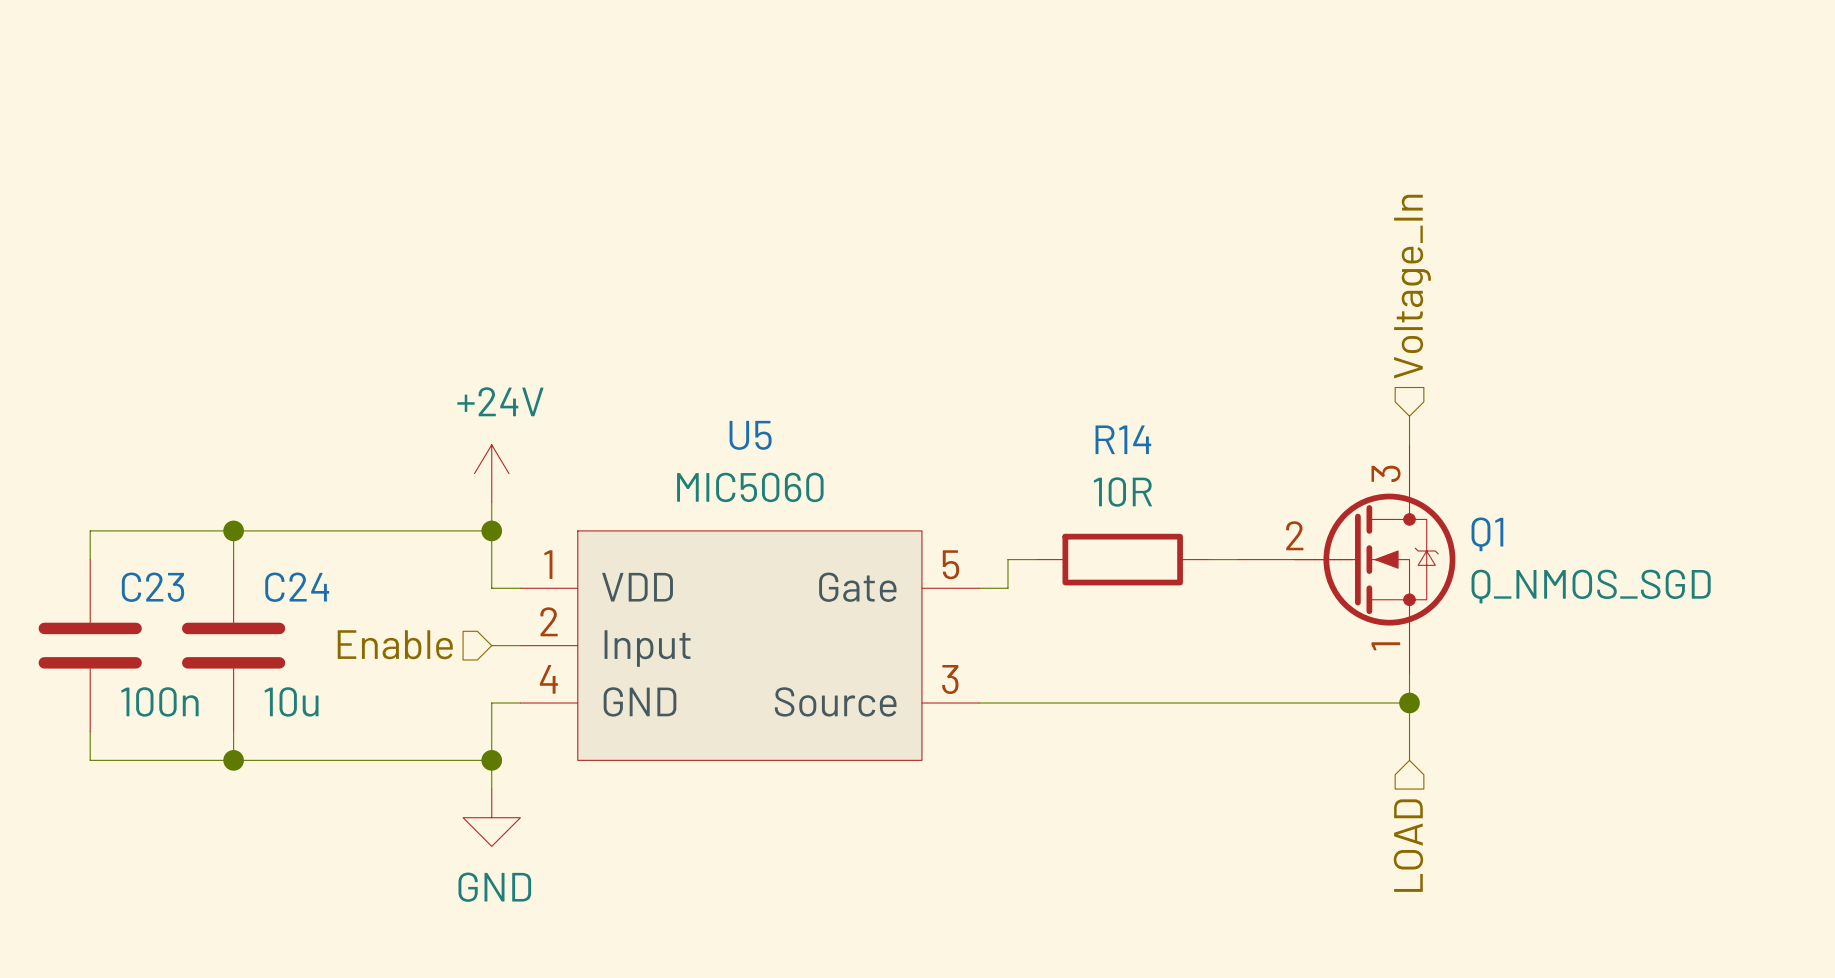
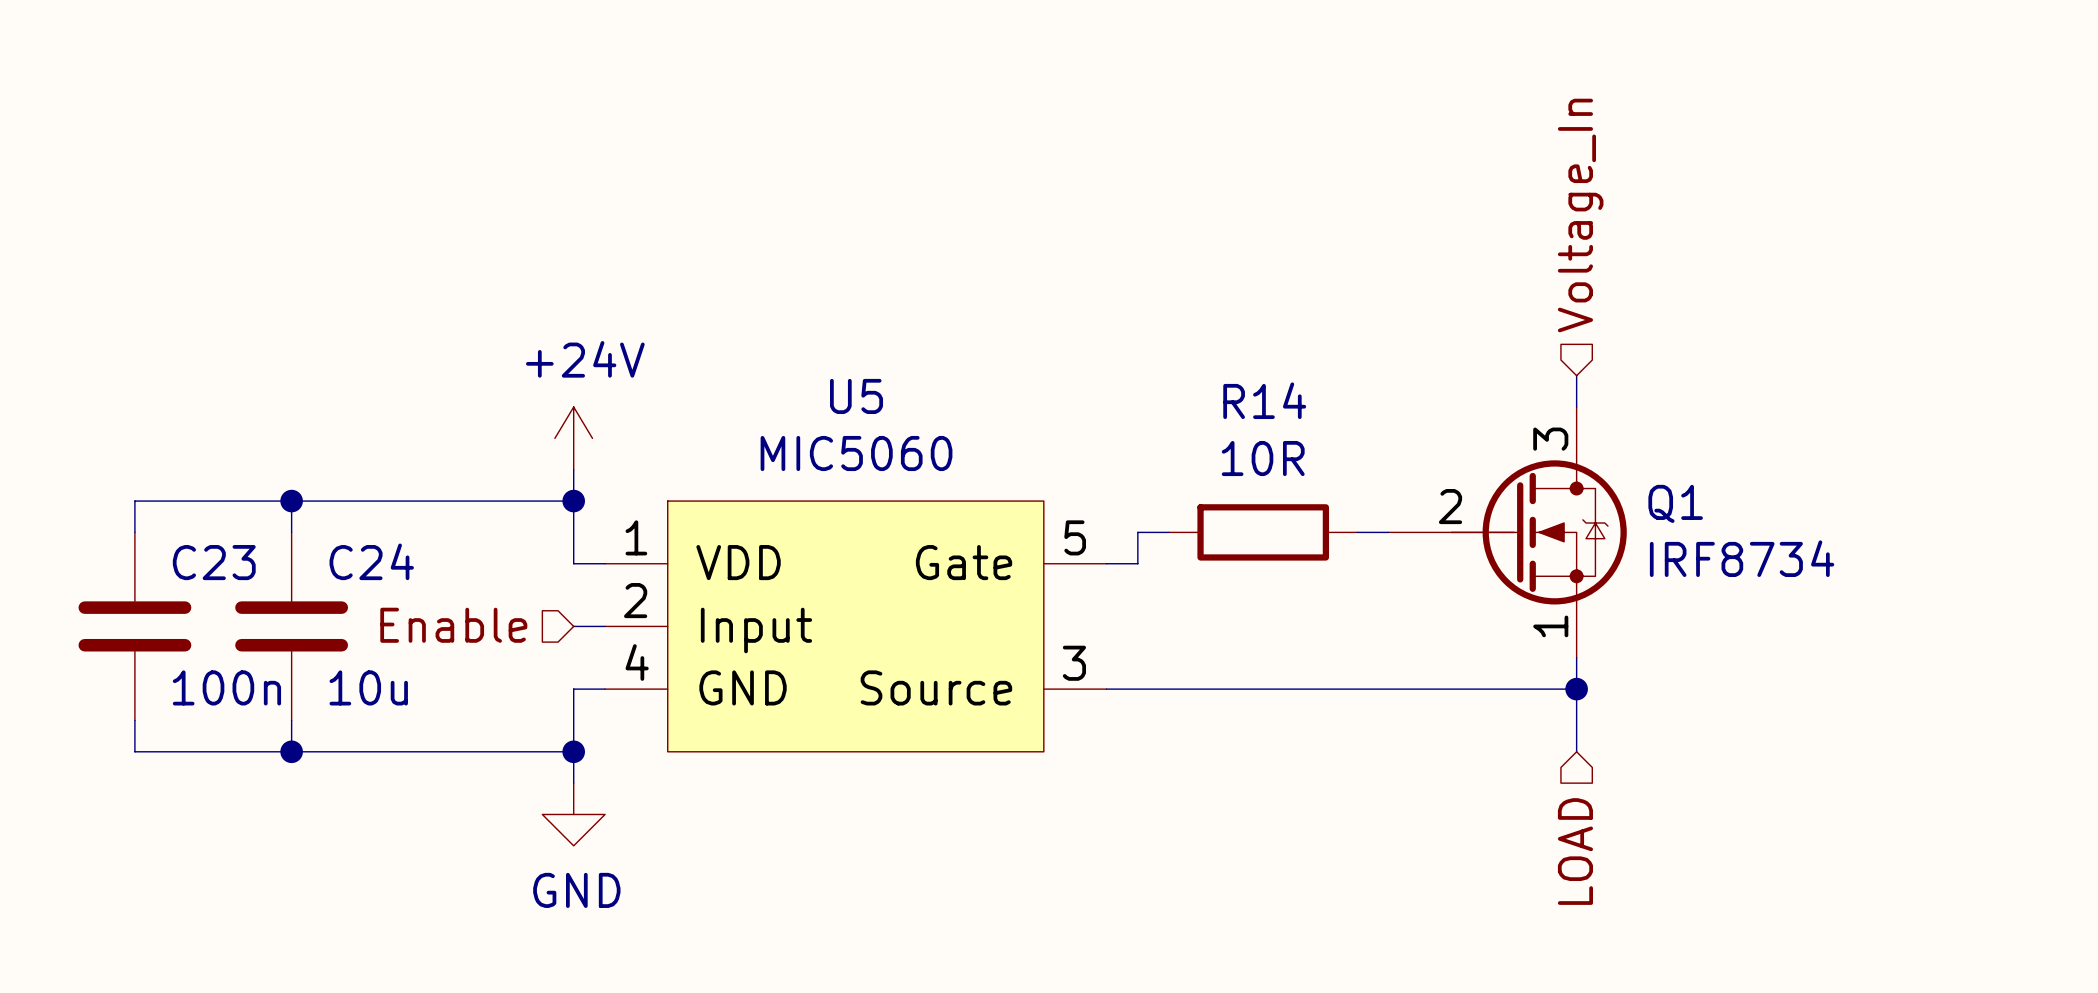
Q1 value: Q_NMOS_SGD (1591, 586) -> IRF8734 (1742, 558)

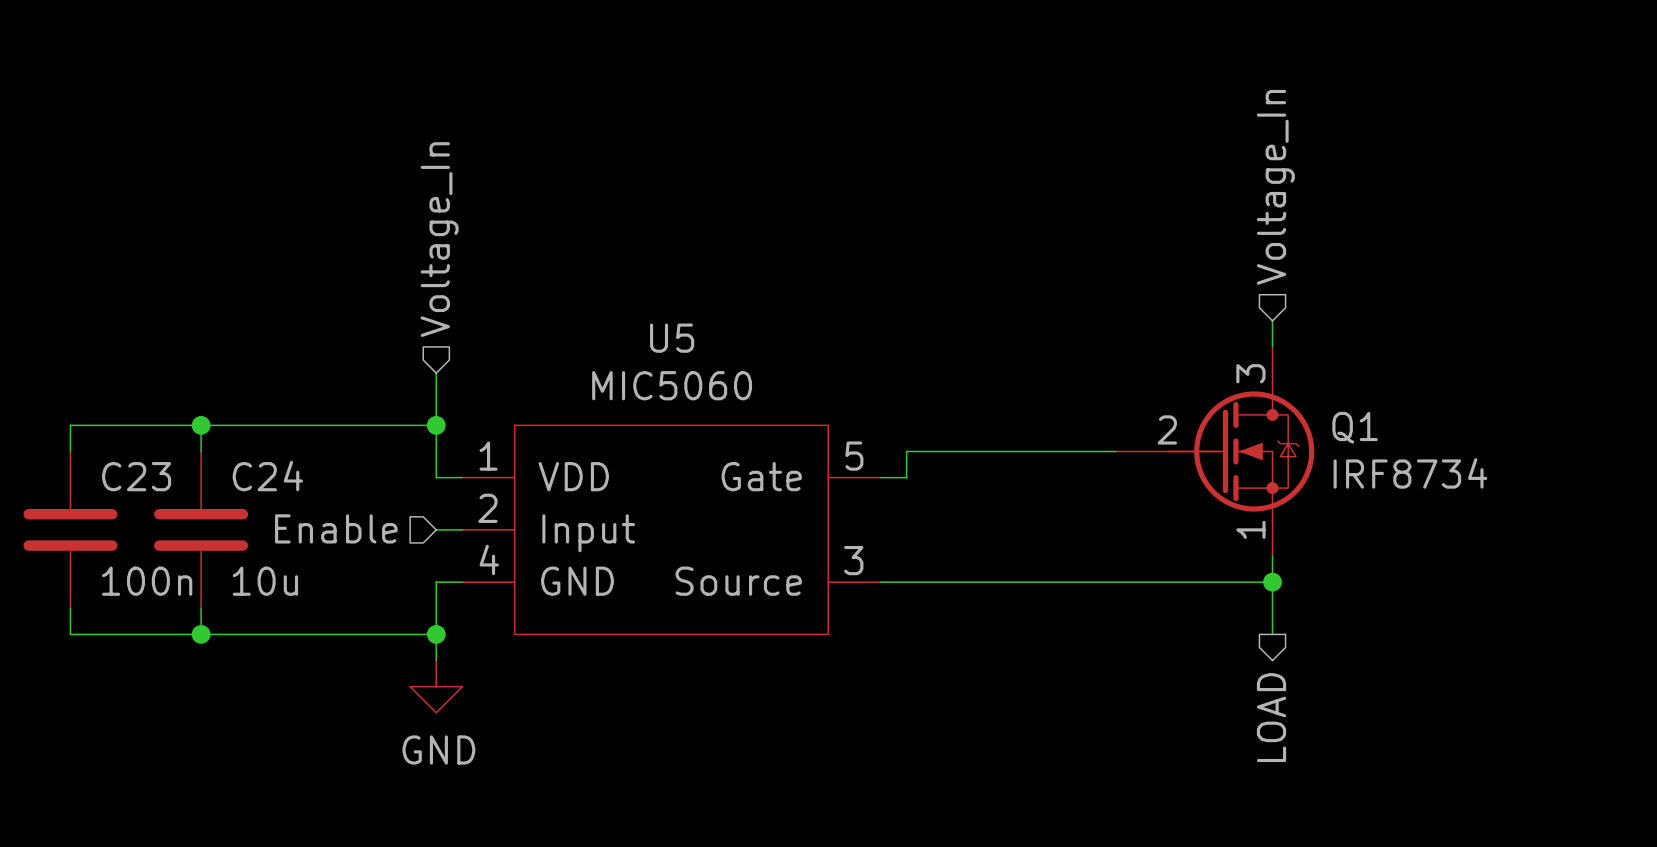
hierarchical label: none -> Voltage_In (439, 239)
power symbol: +24V (573, 438) -> none
wire: none -> (932, 451) (1089, 451)
R14: 10R (1263, 532) -> none
hierarchical label shape: input (1575, 851) -> output (1271, 717)

